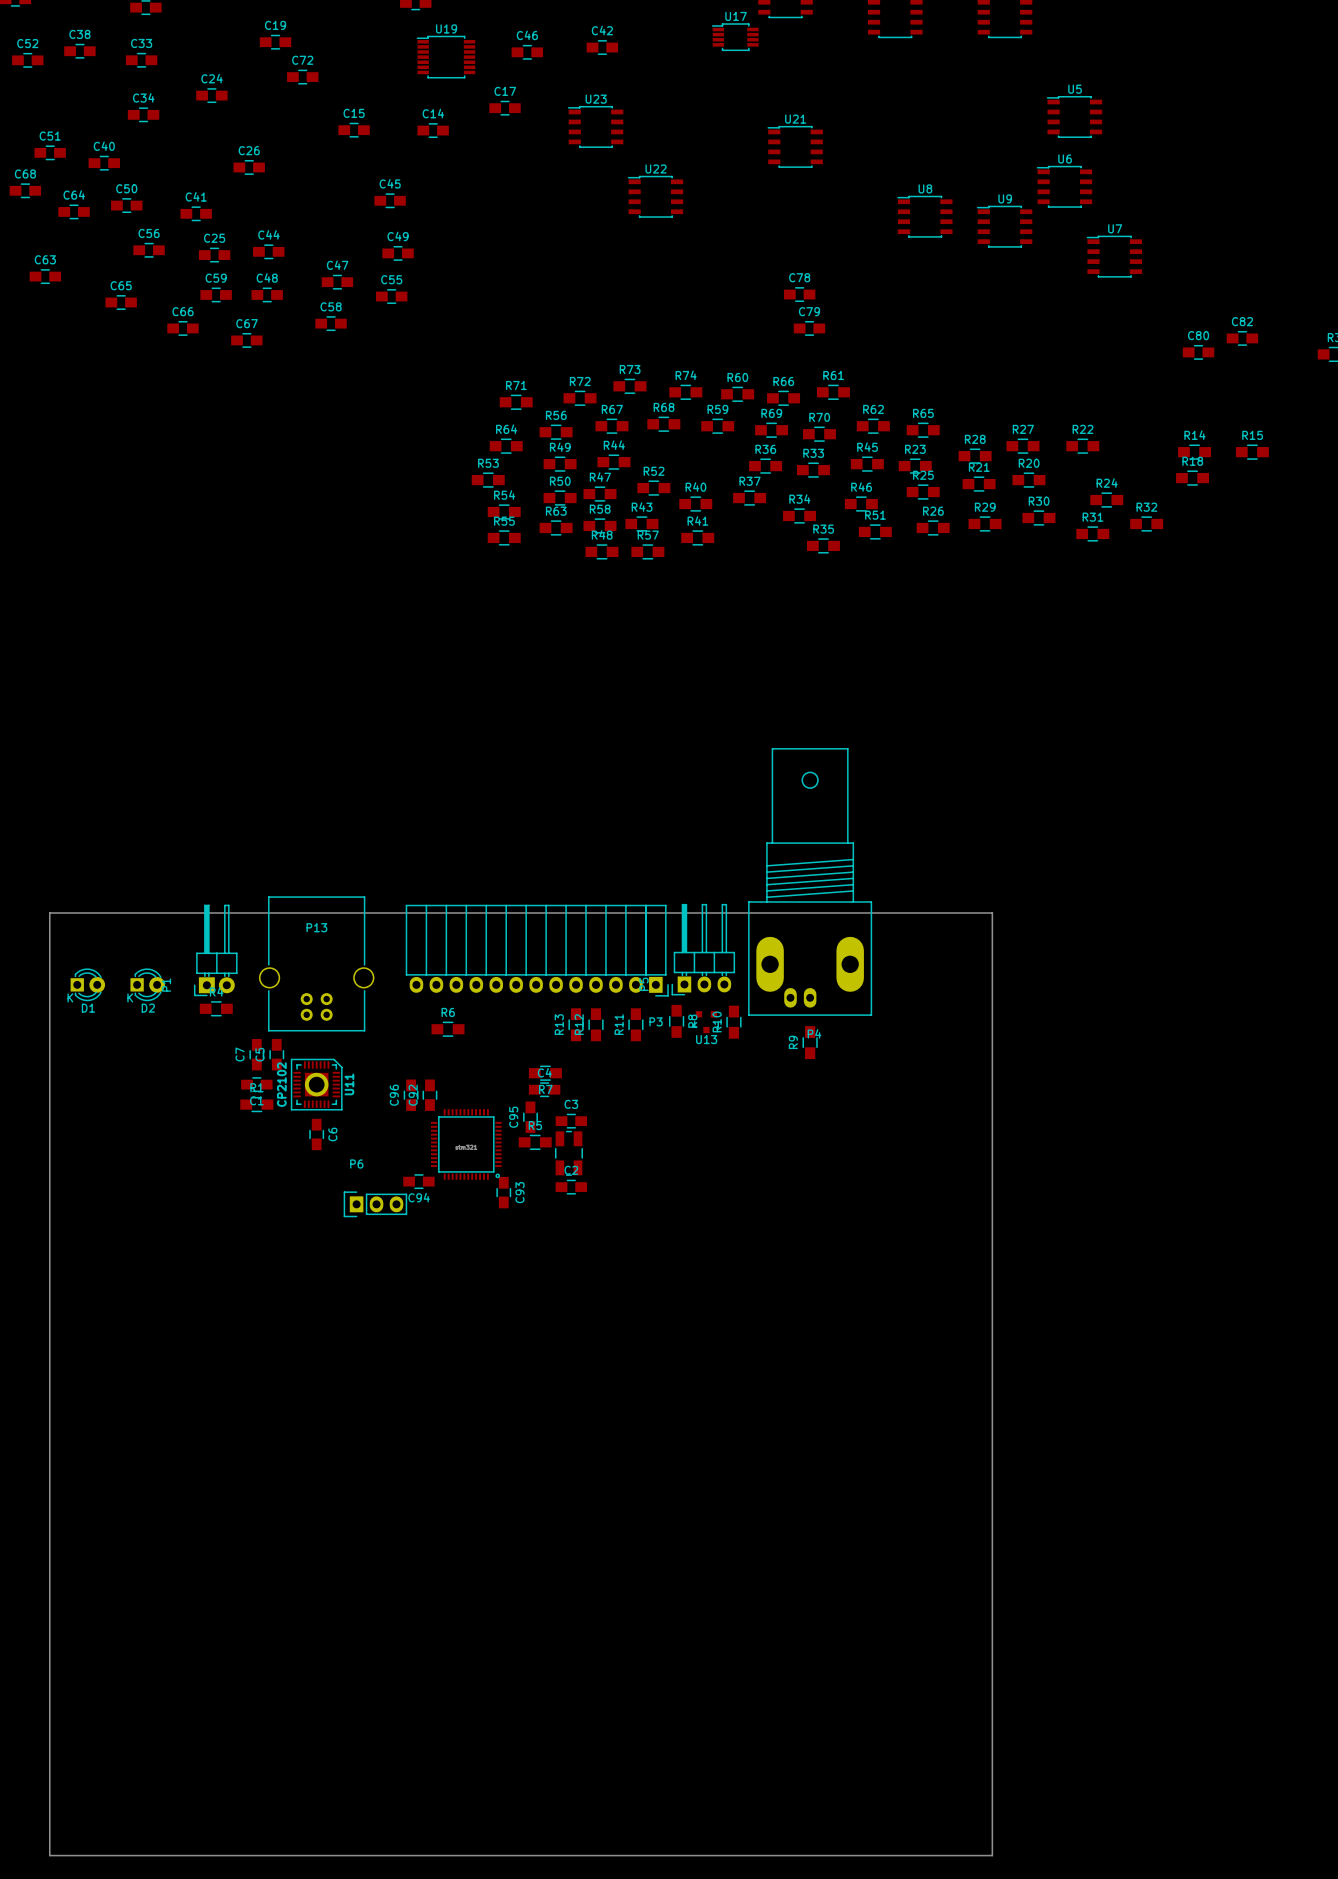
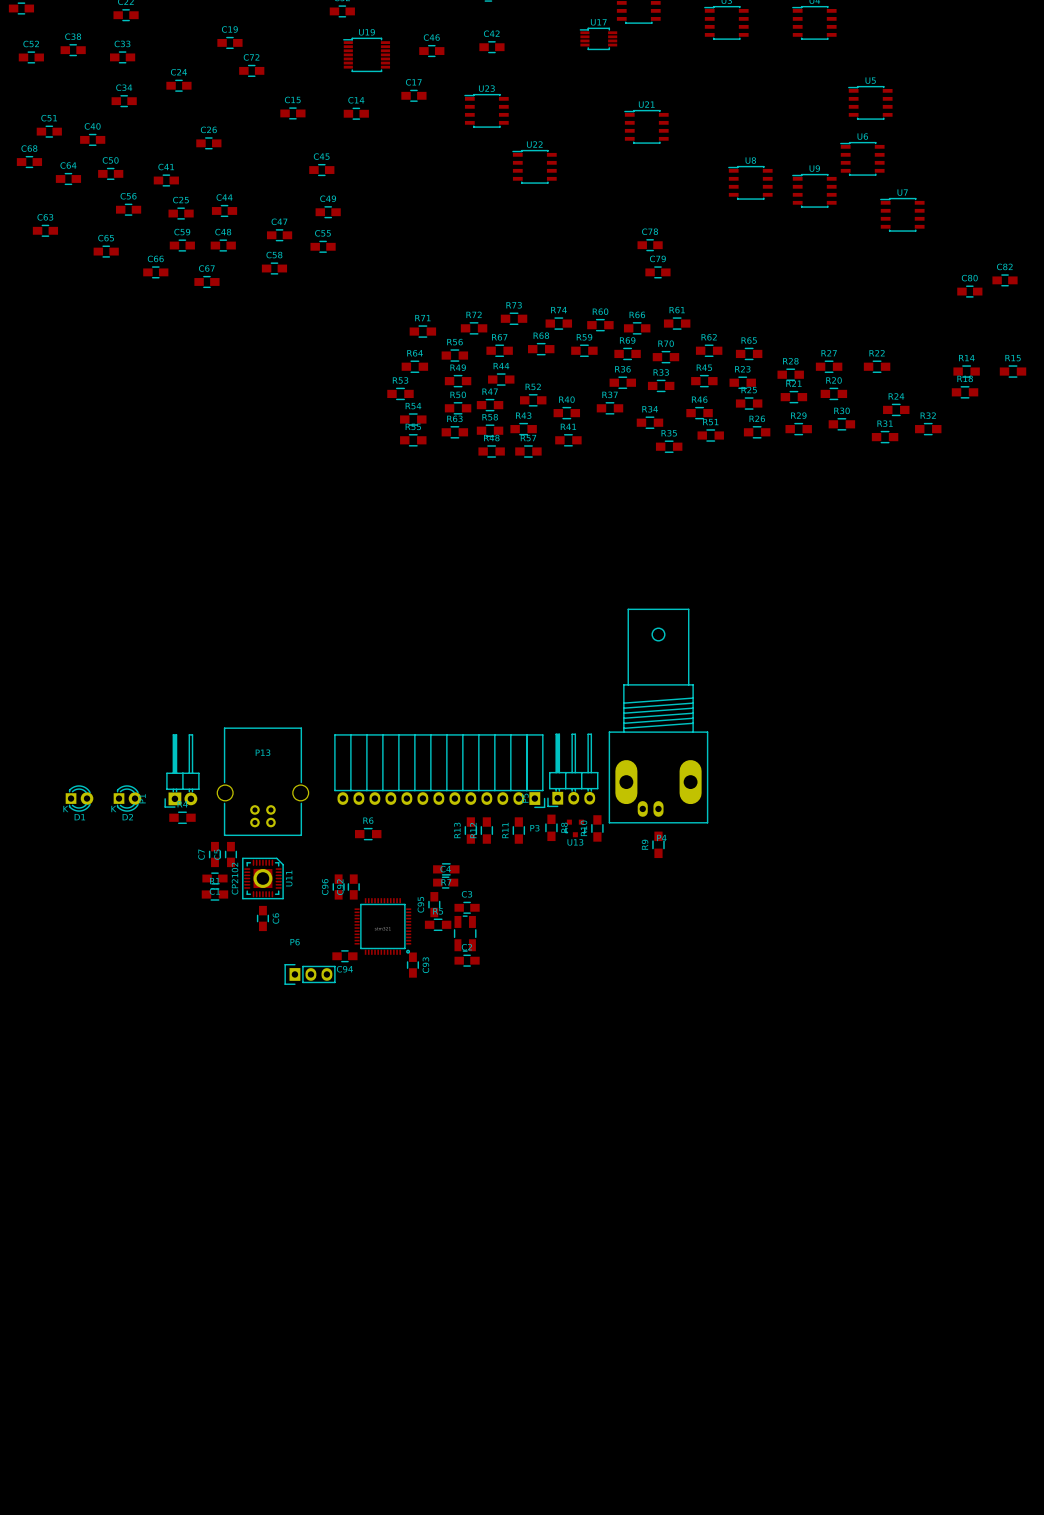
line: (49, 912) (49, 1855) (992, 1855) (992, 912) (49, 912) -> none

